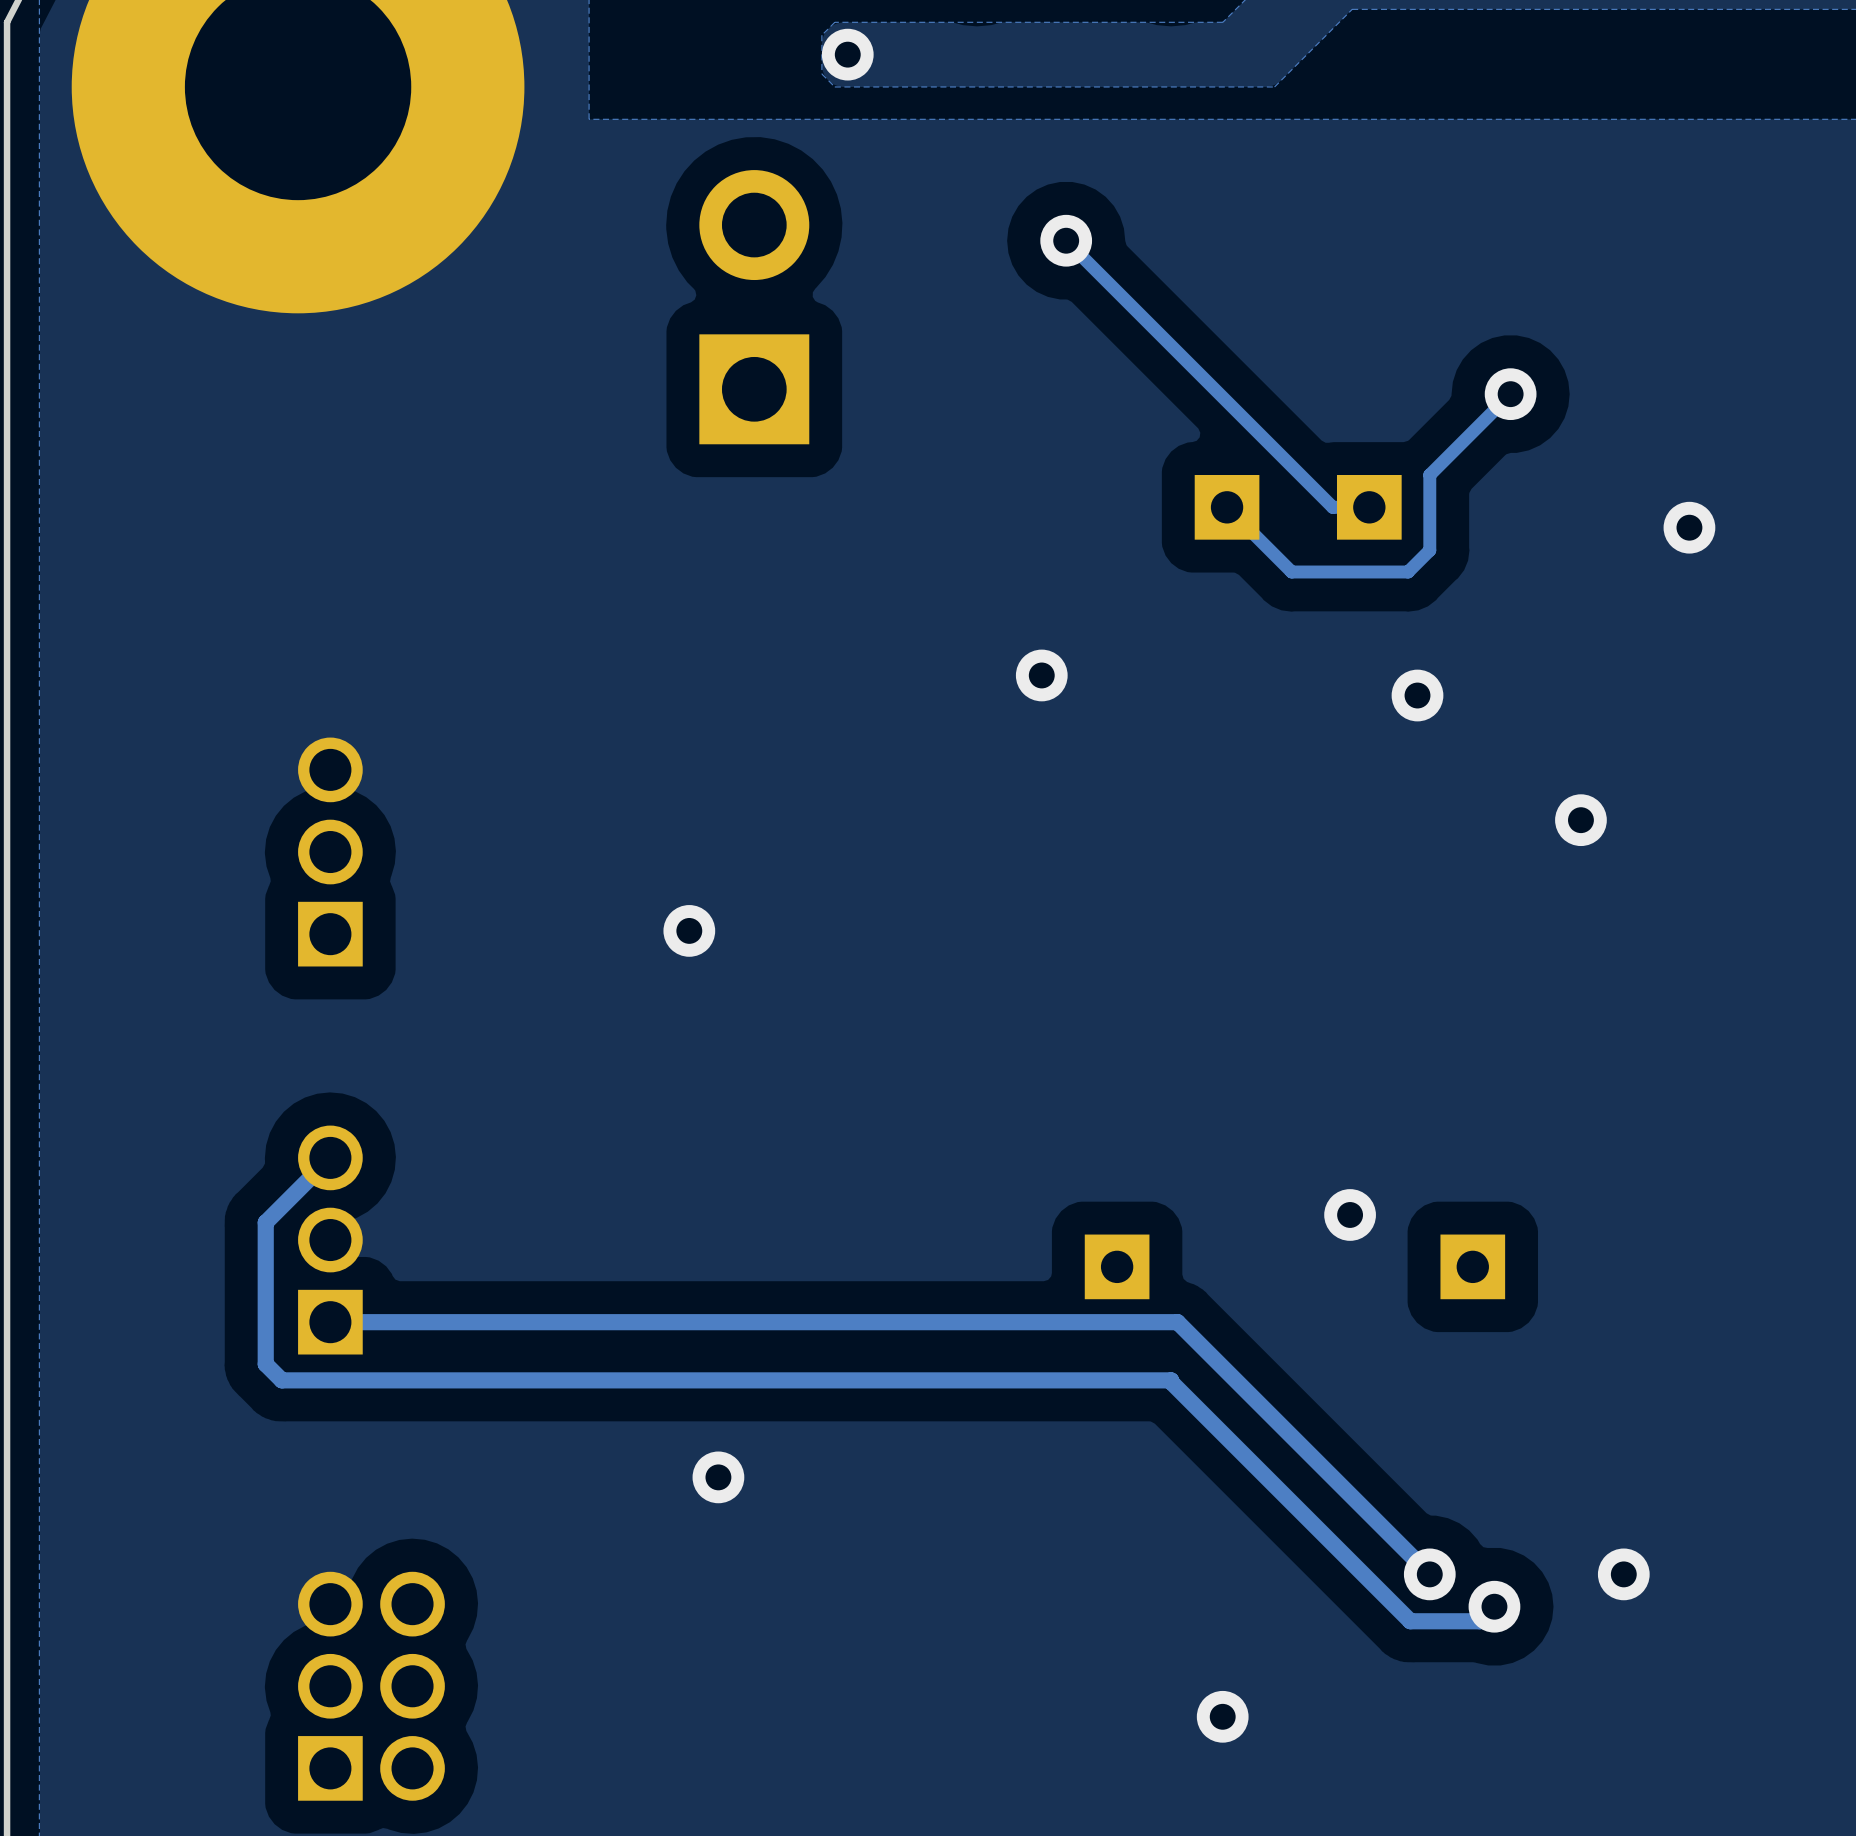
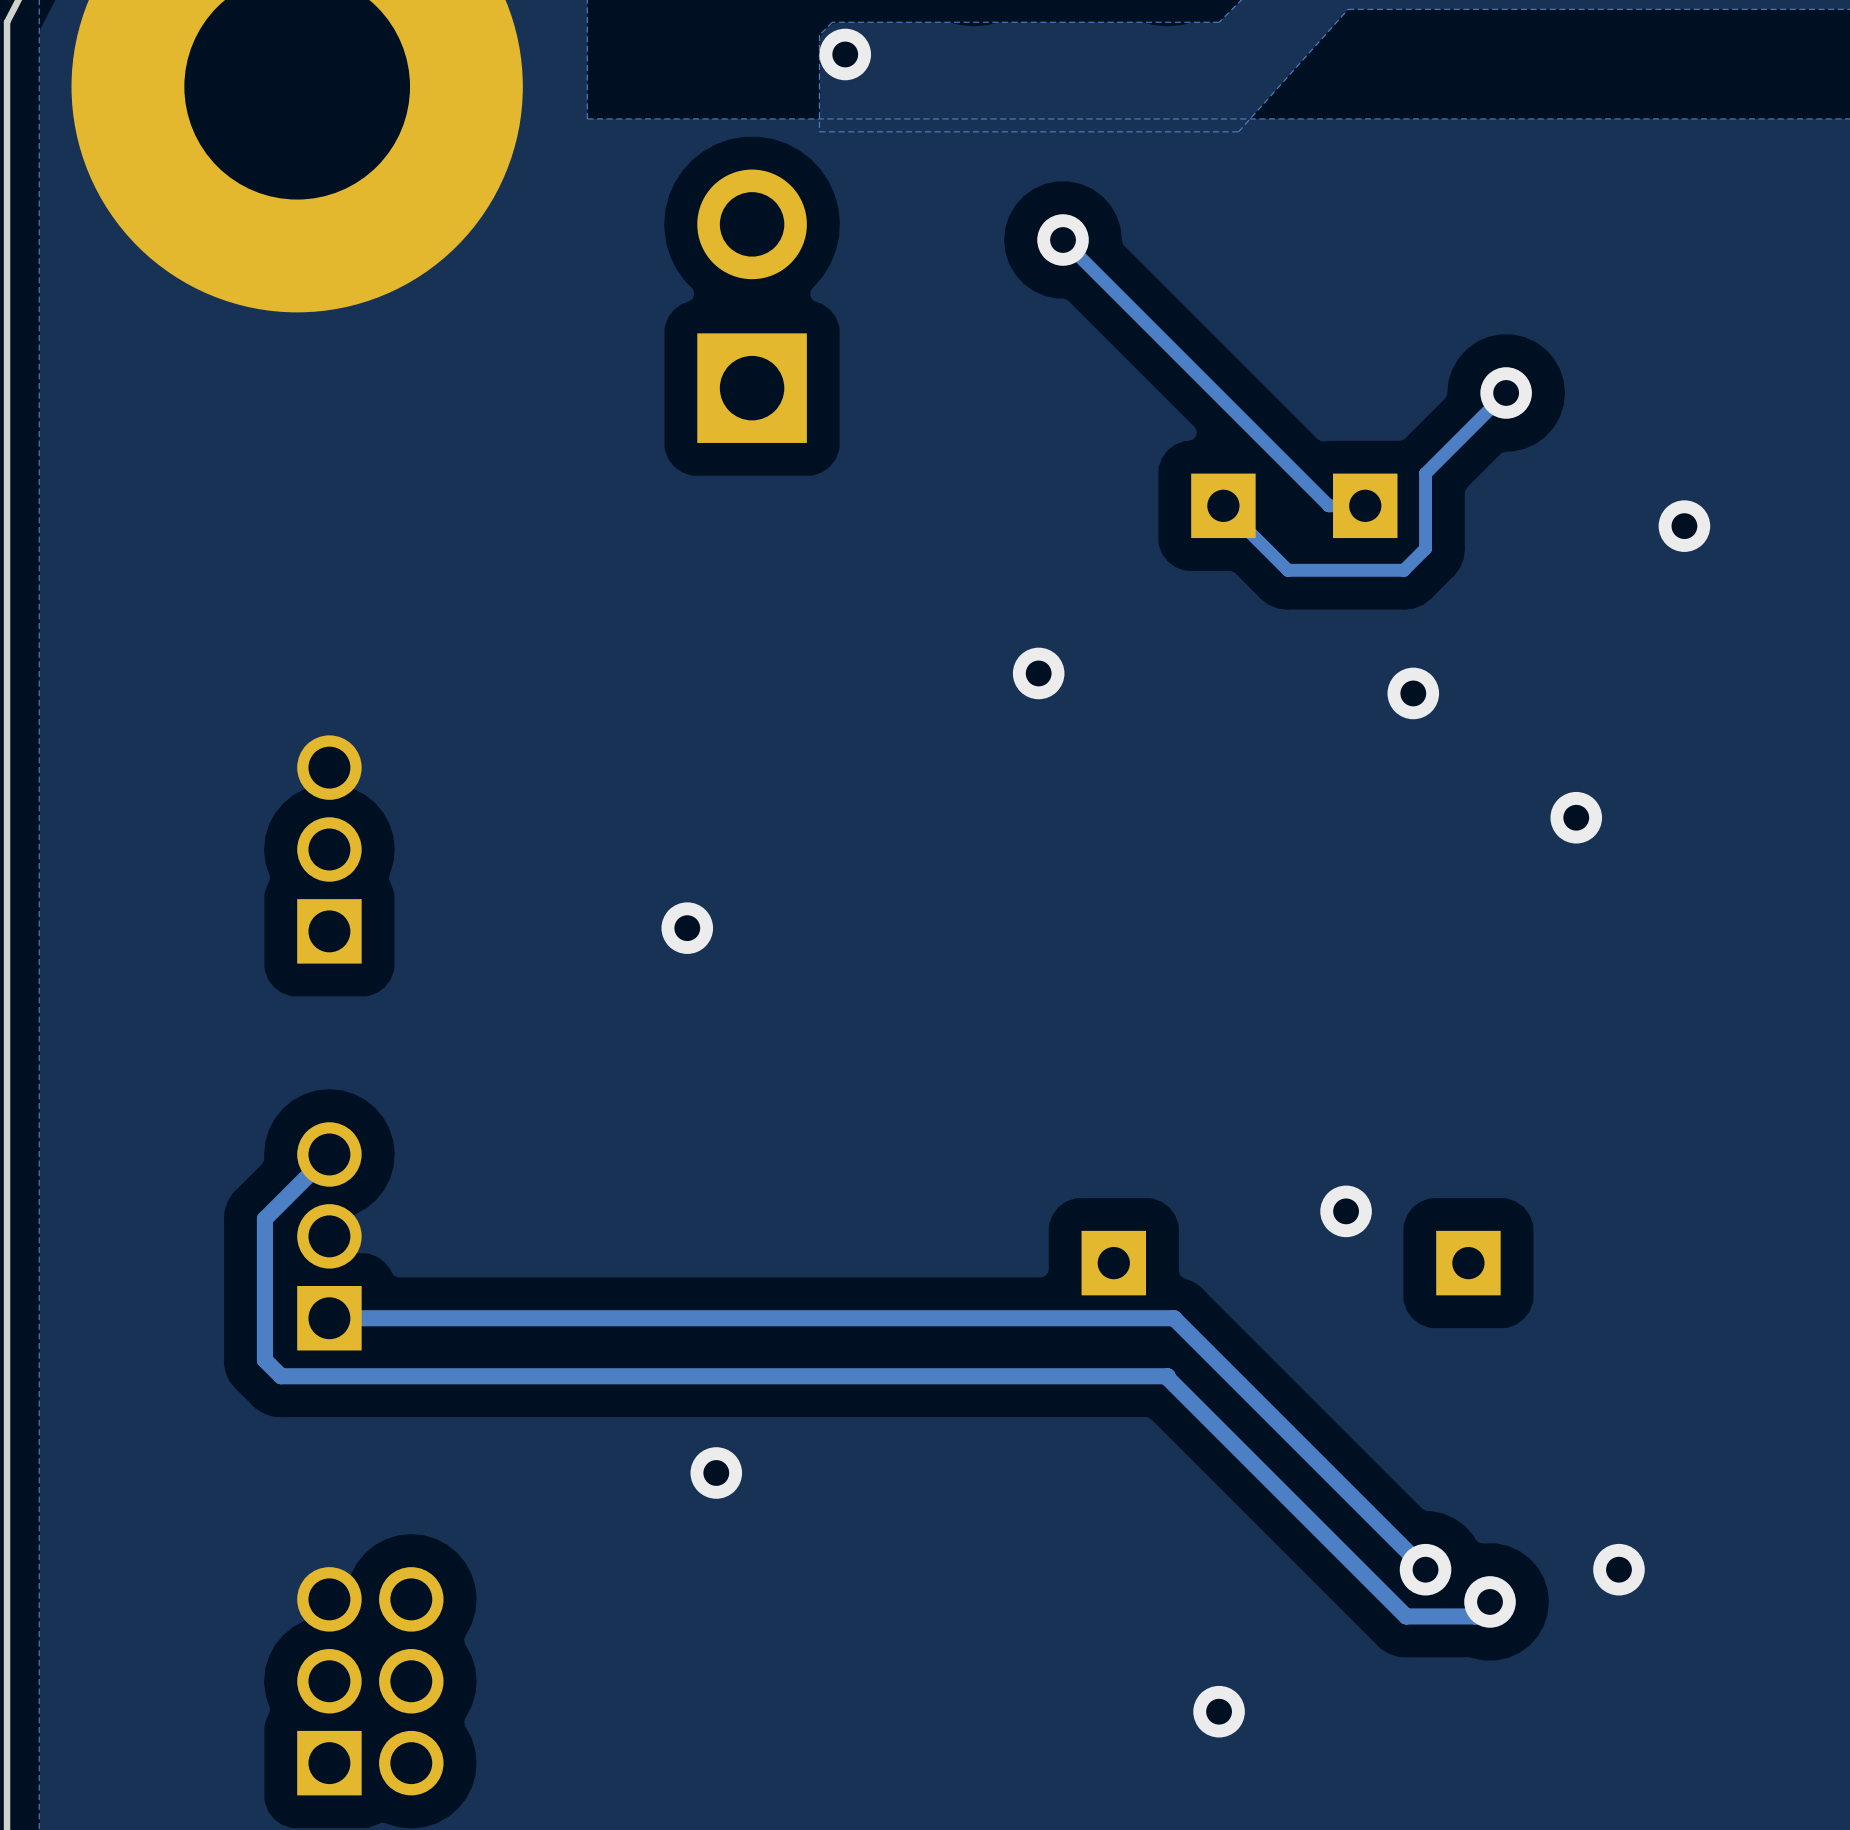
zone outline: (1352, 9) (1274, 86) (834, 86) (821, 74) -> (1348, 9) (1238, 131) (819, 131) (819, 73)

